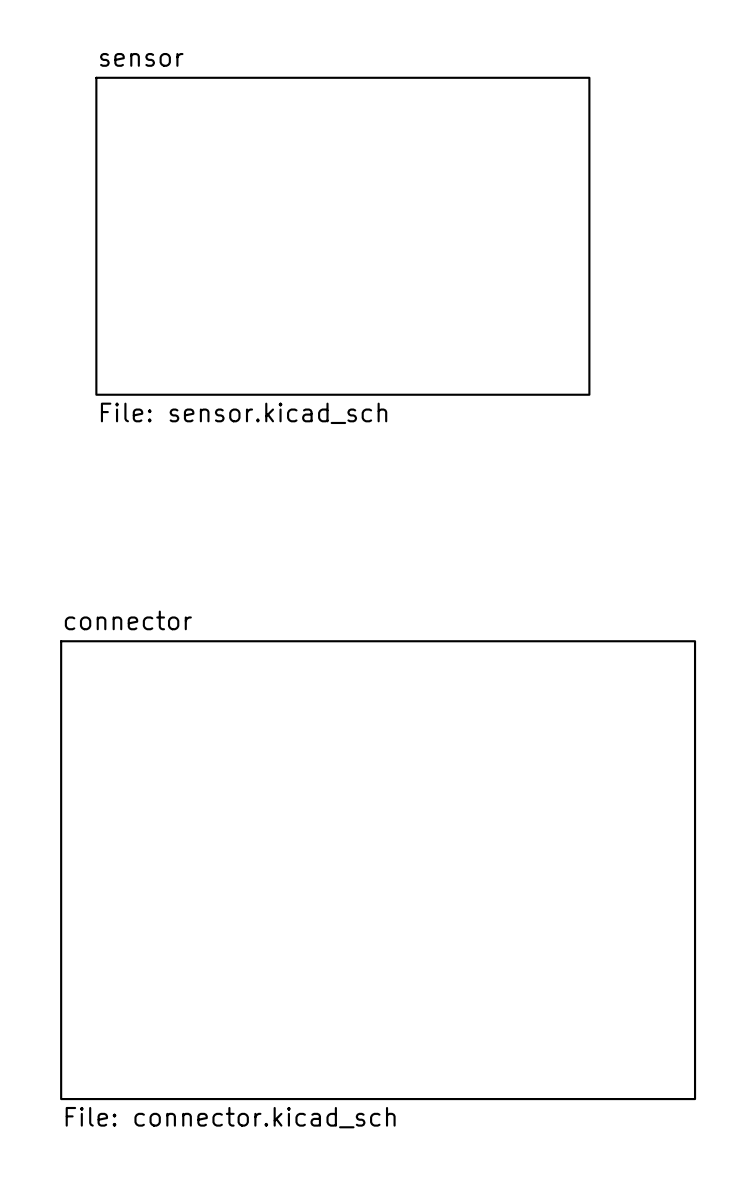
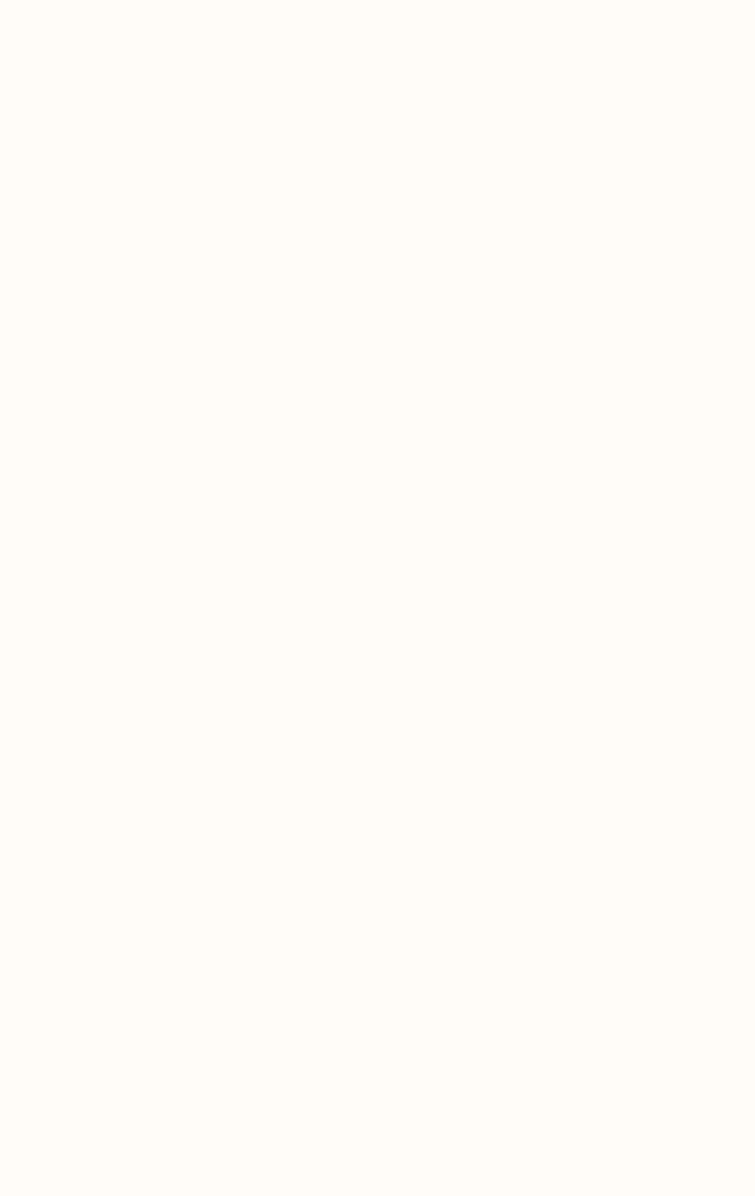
sheet sensor: File: sensor.kicad_sch (342, 236) -> none
sheet connector: File: connector.kicad_sch (378, 870) -> none

